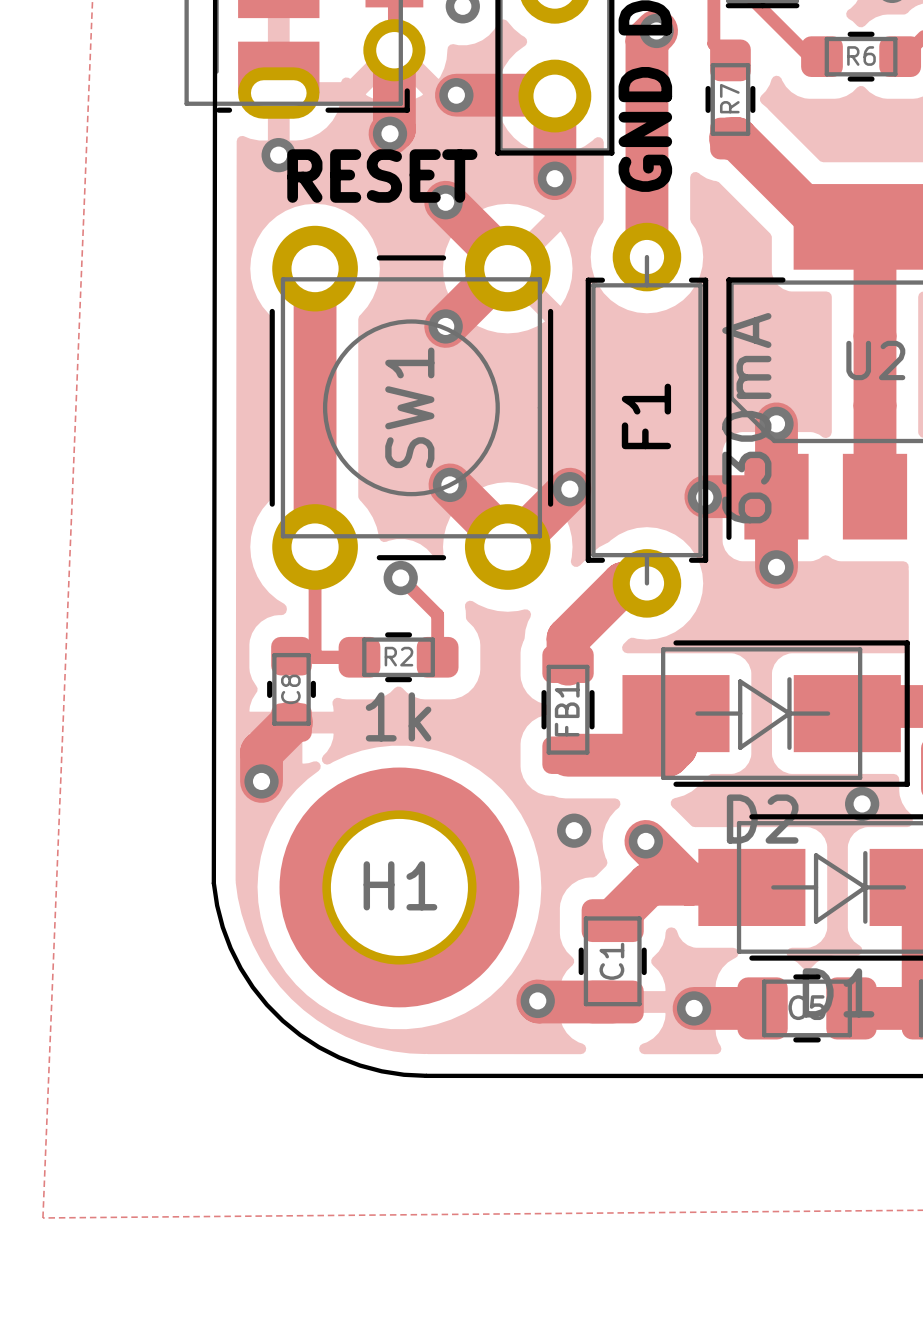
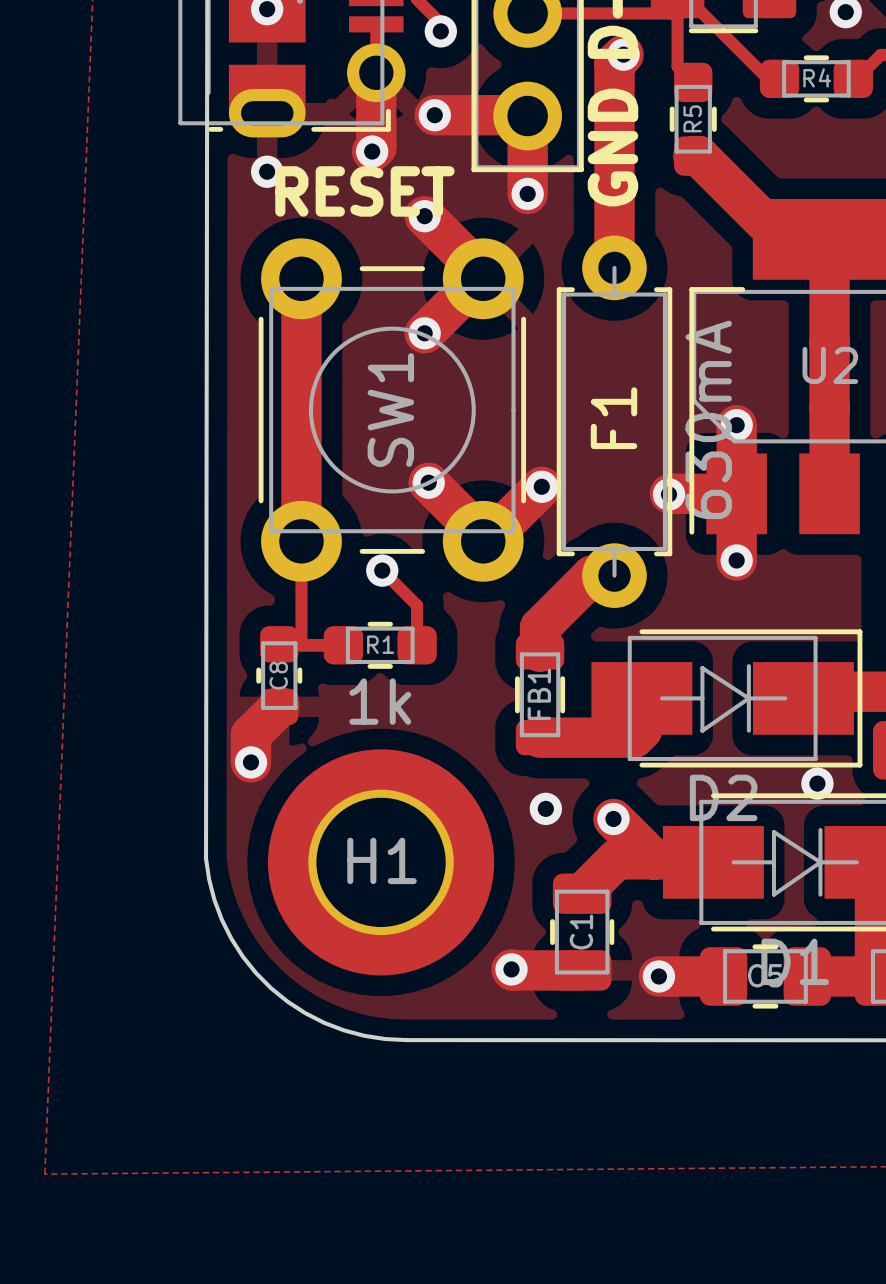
R6 name: R6 (861, 56) -> R4 (817, 77)
R7 name: R7 (729, 98) -> R5 (692, 118)
R2 name: R2 (398, 656) -> R1 (380, 644)

